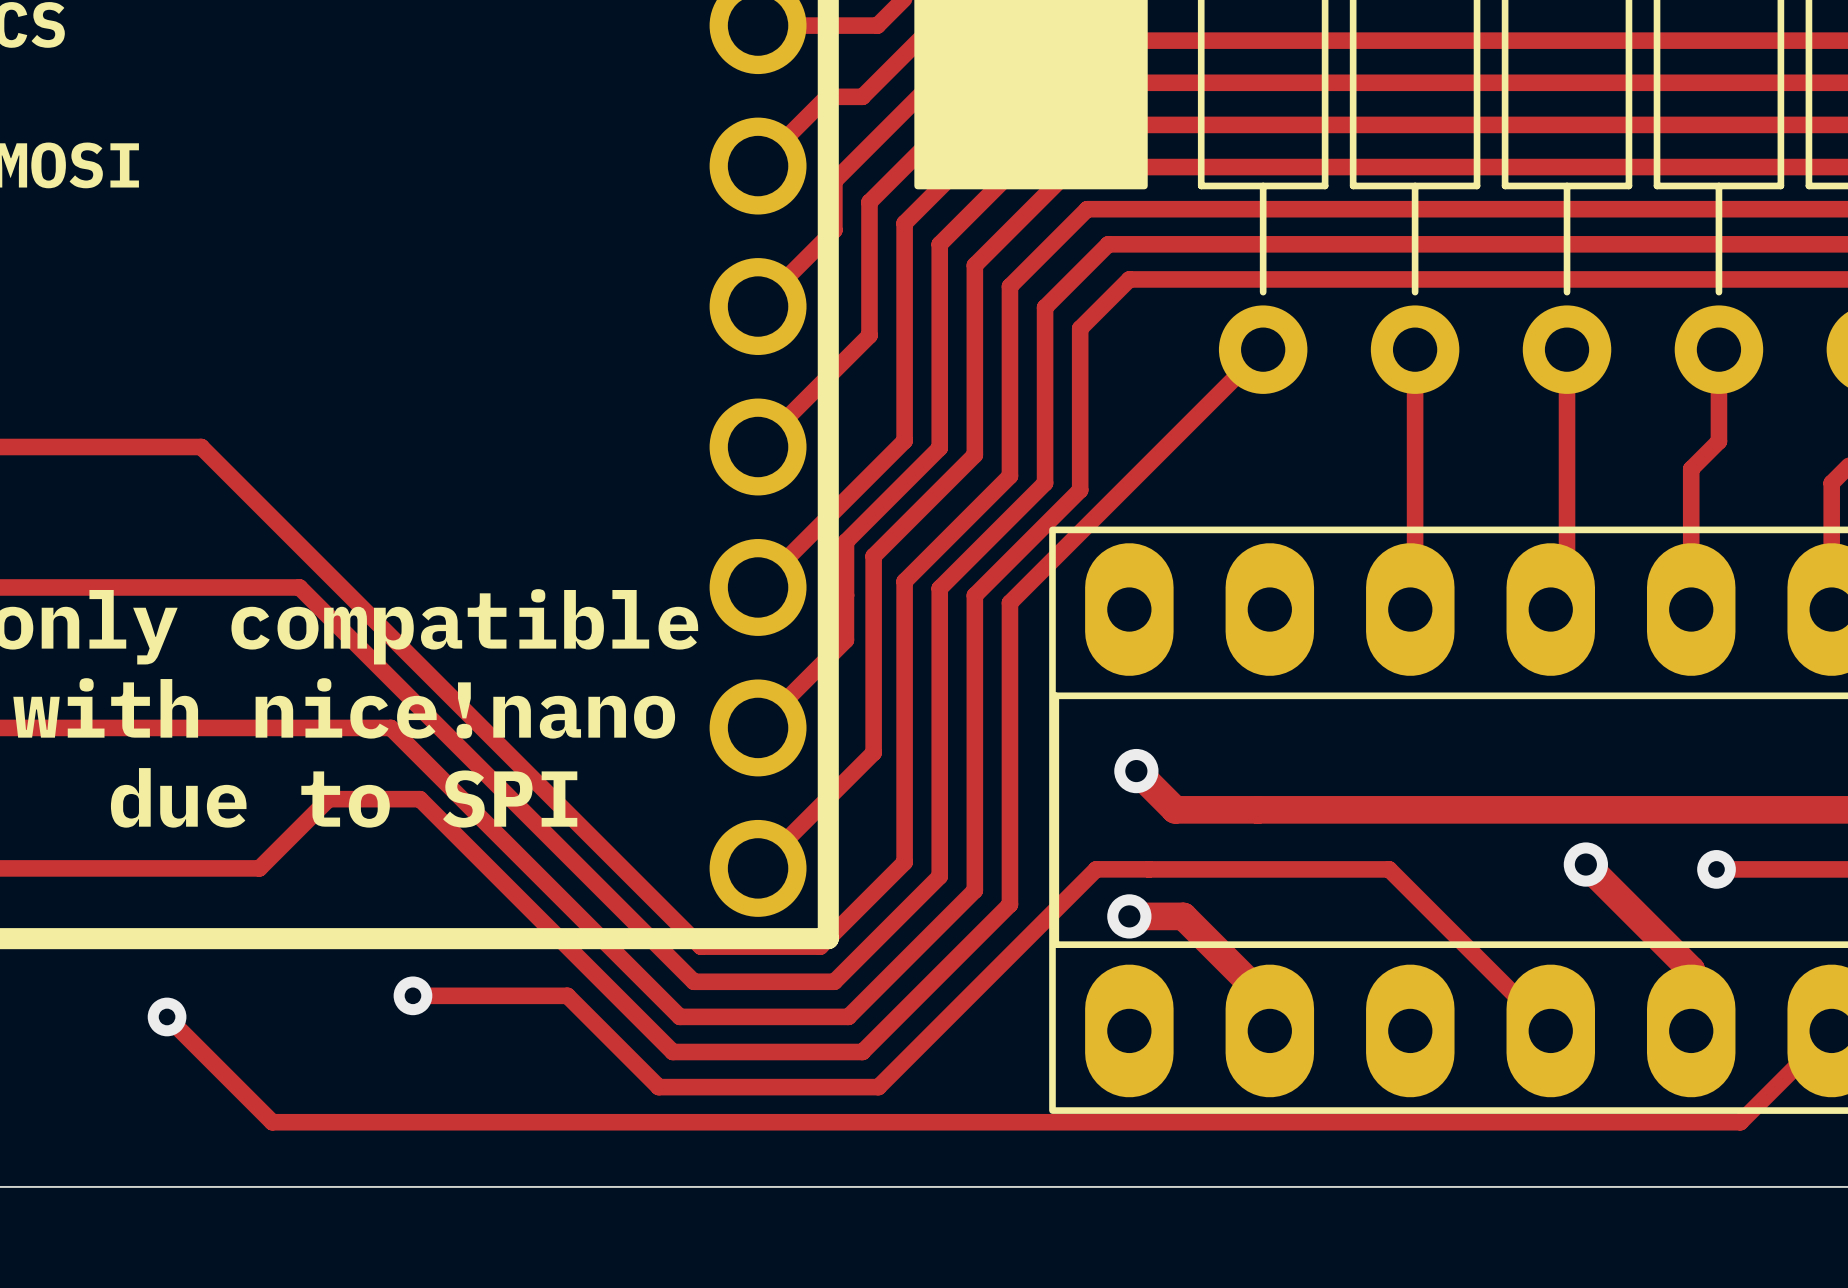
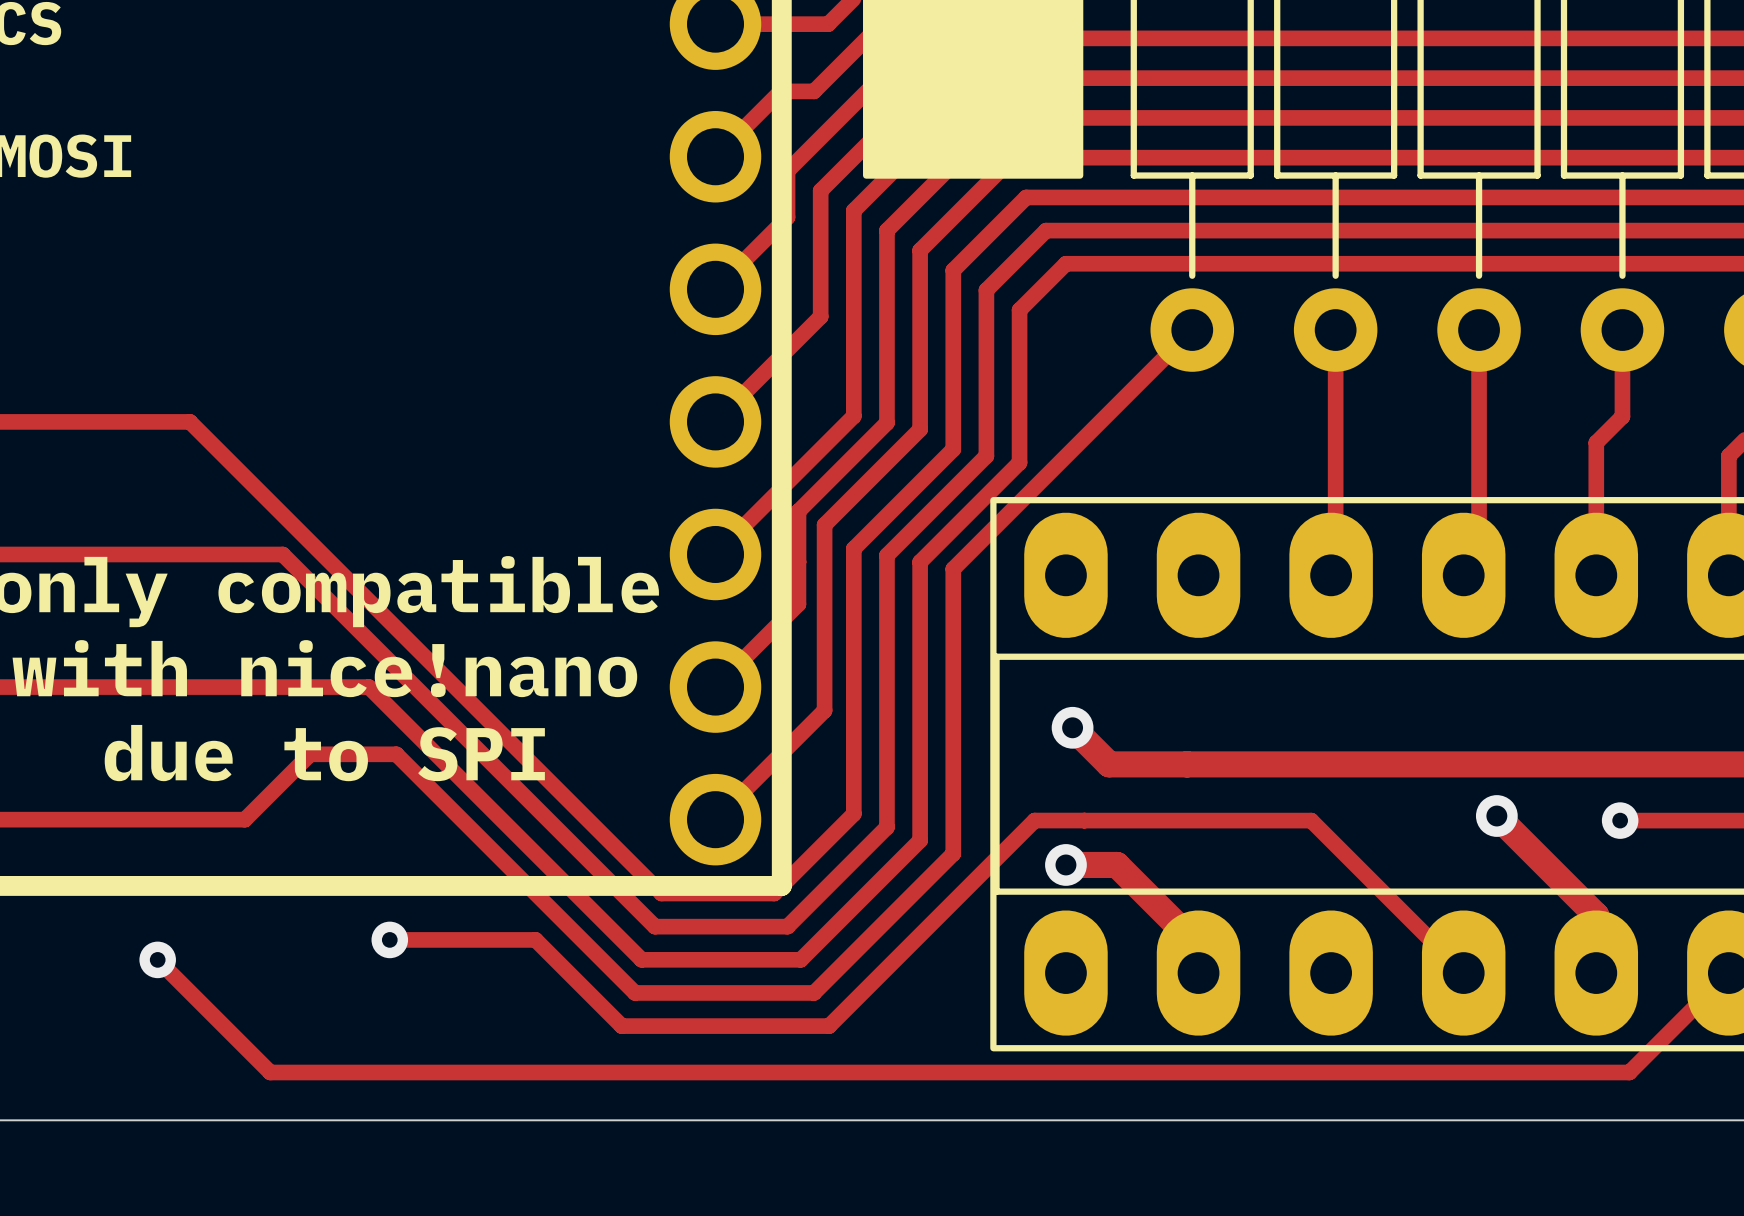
track: (272, 1122) (1740, 1122) -> (257, 1059) (270, 1072) (1629, 1072) (1642, 1059)

